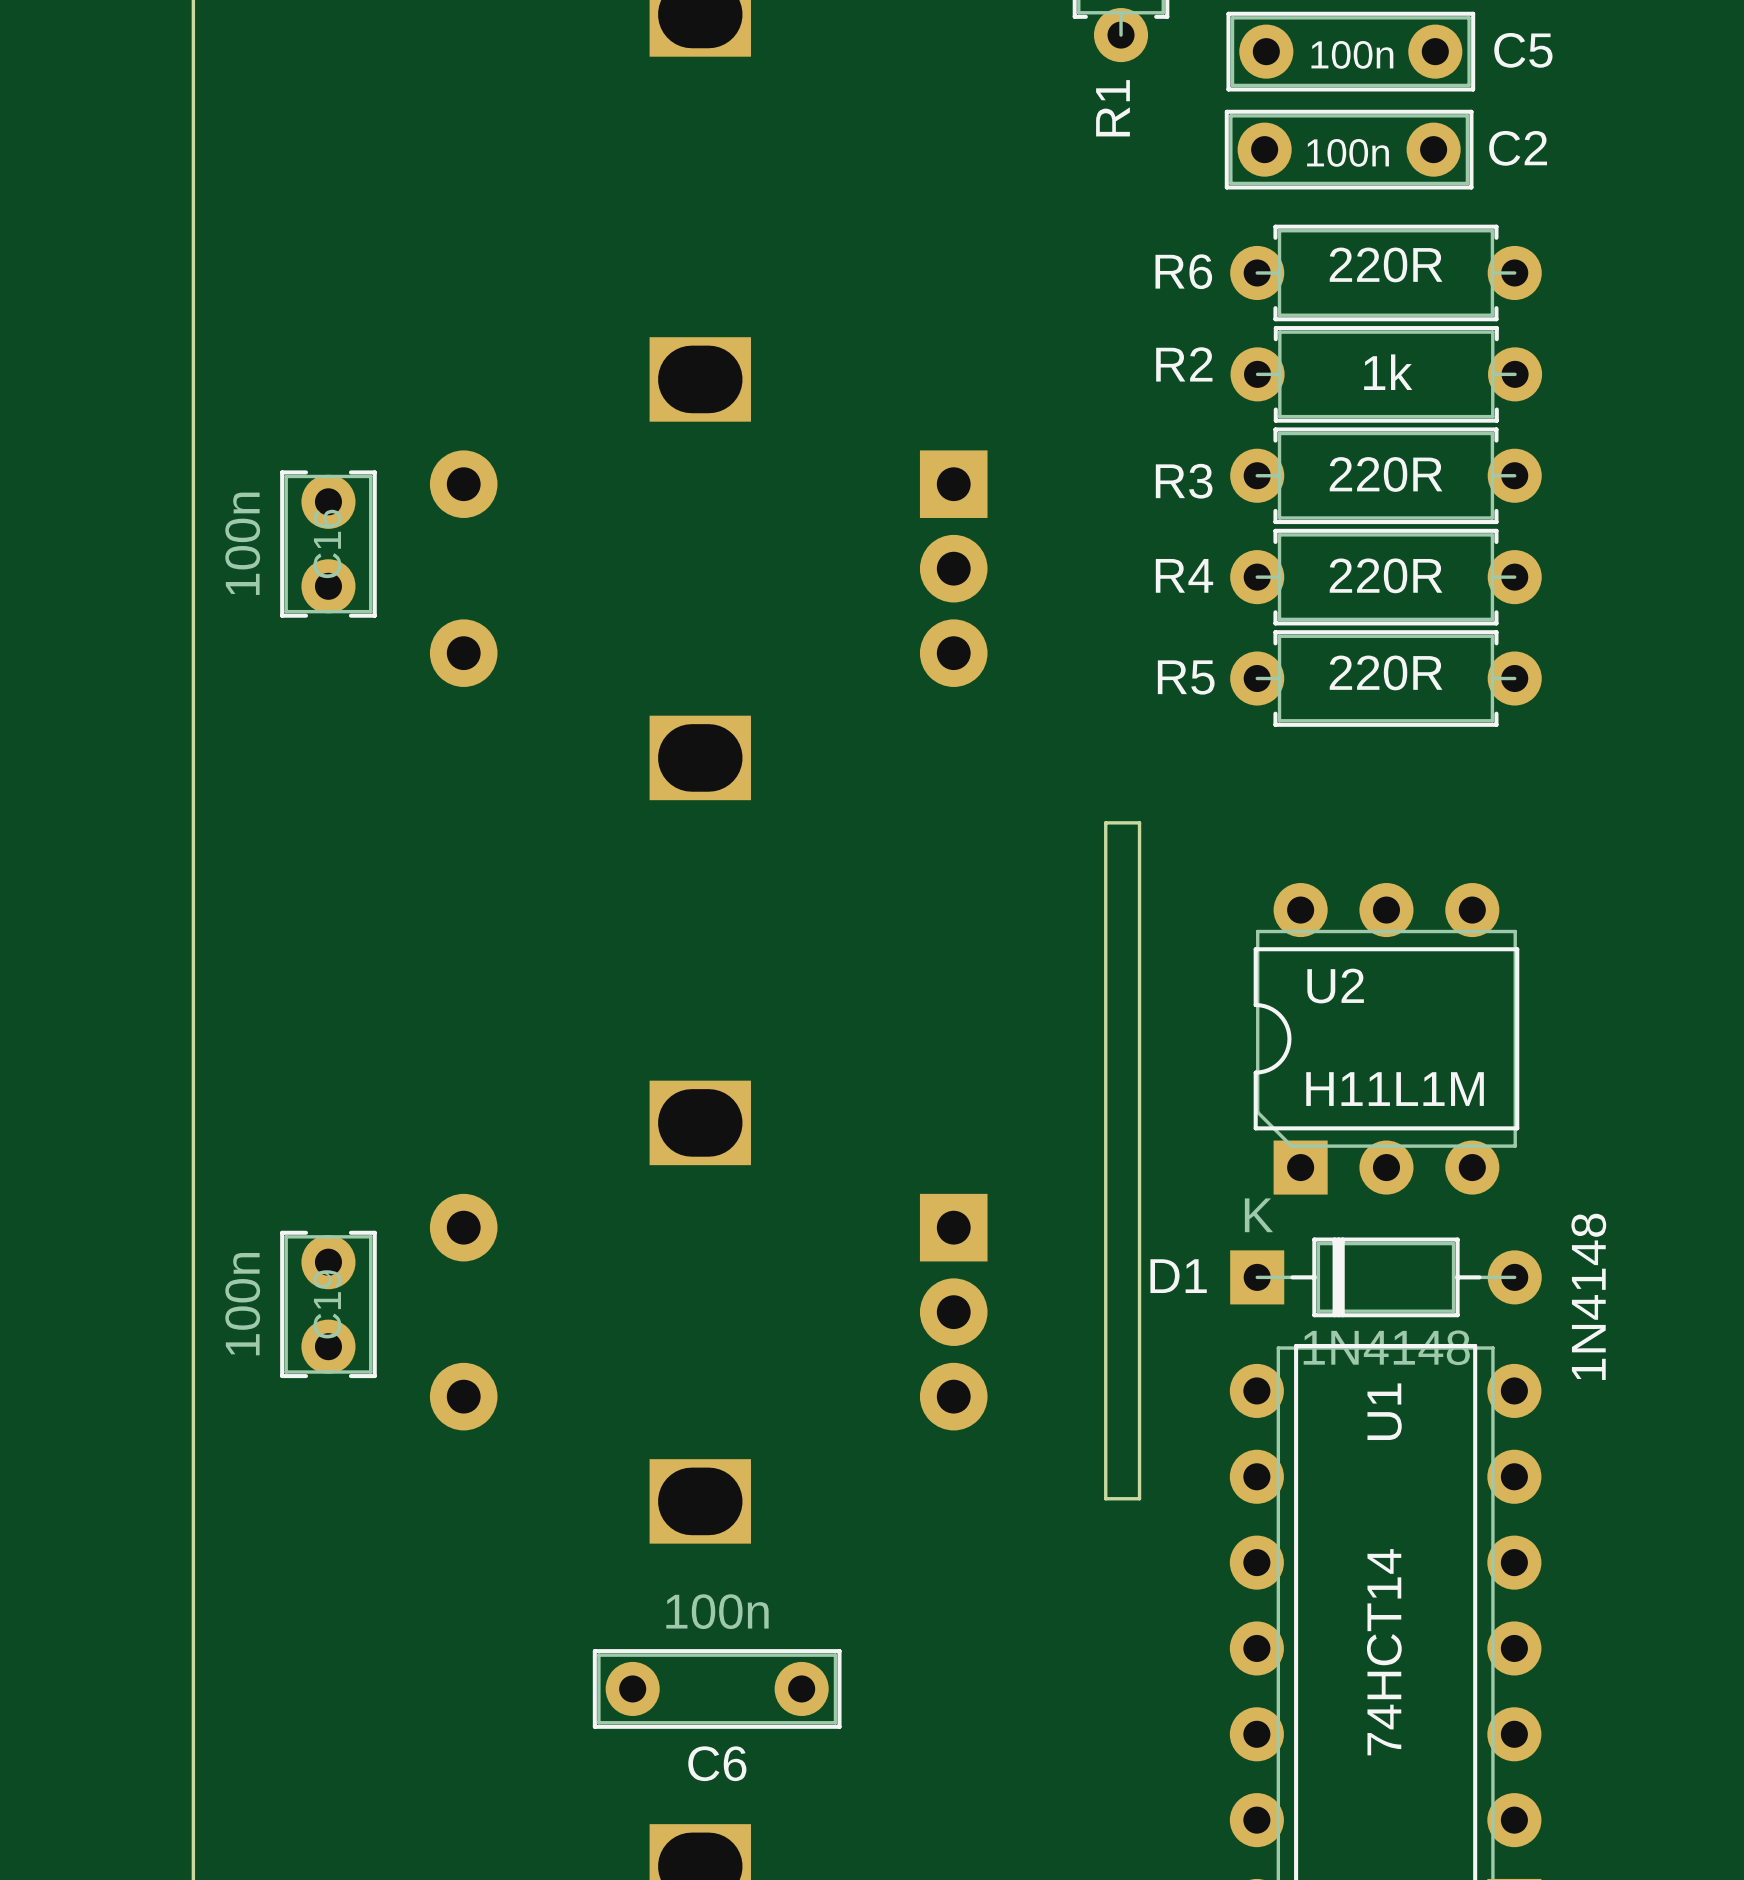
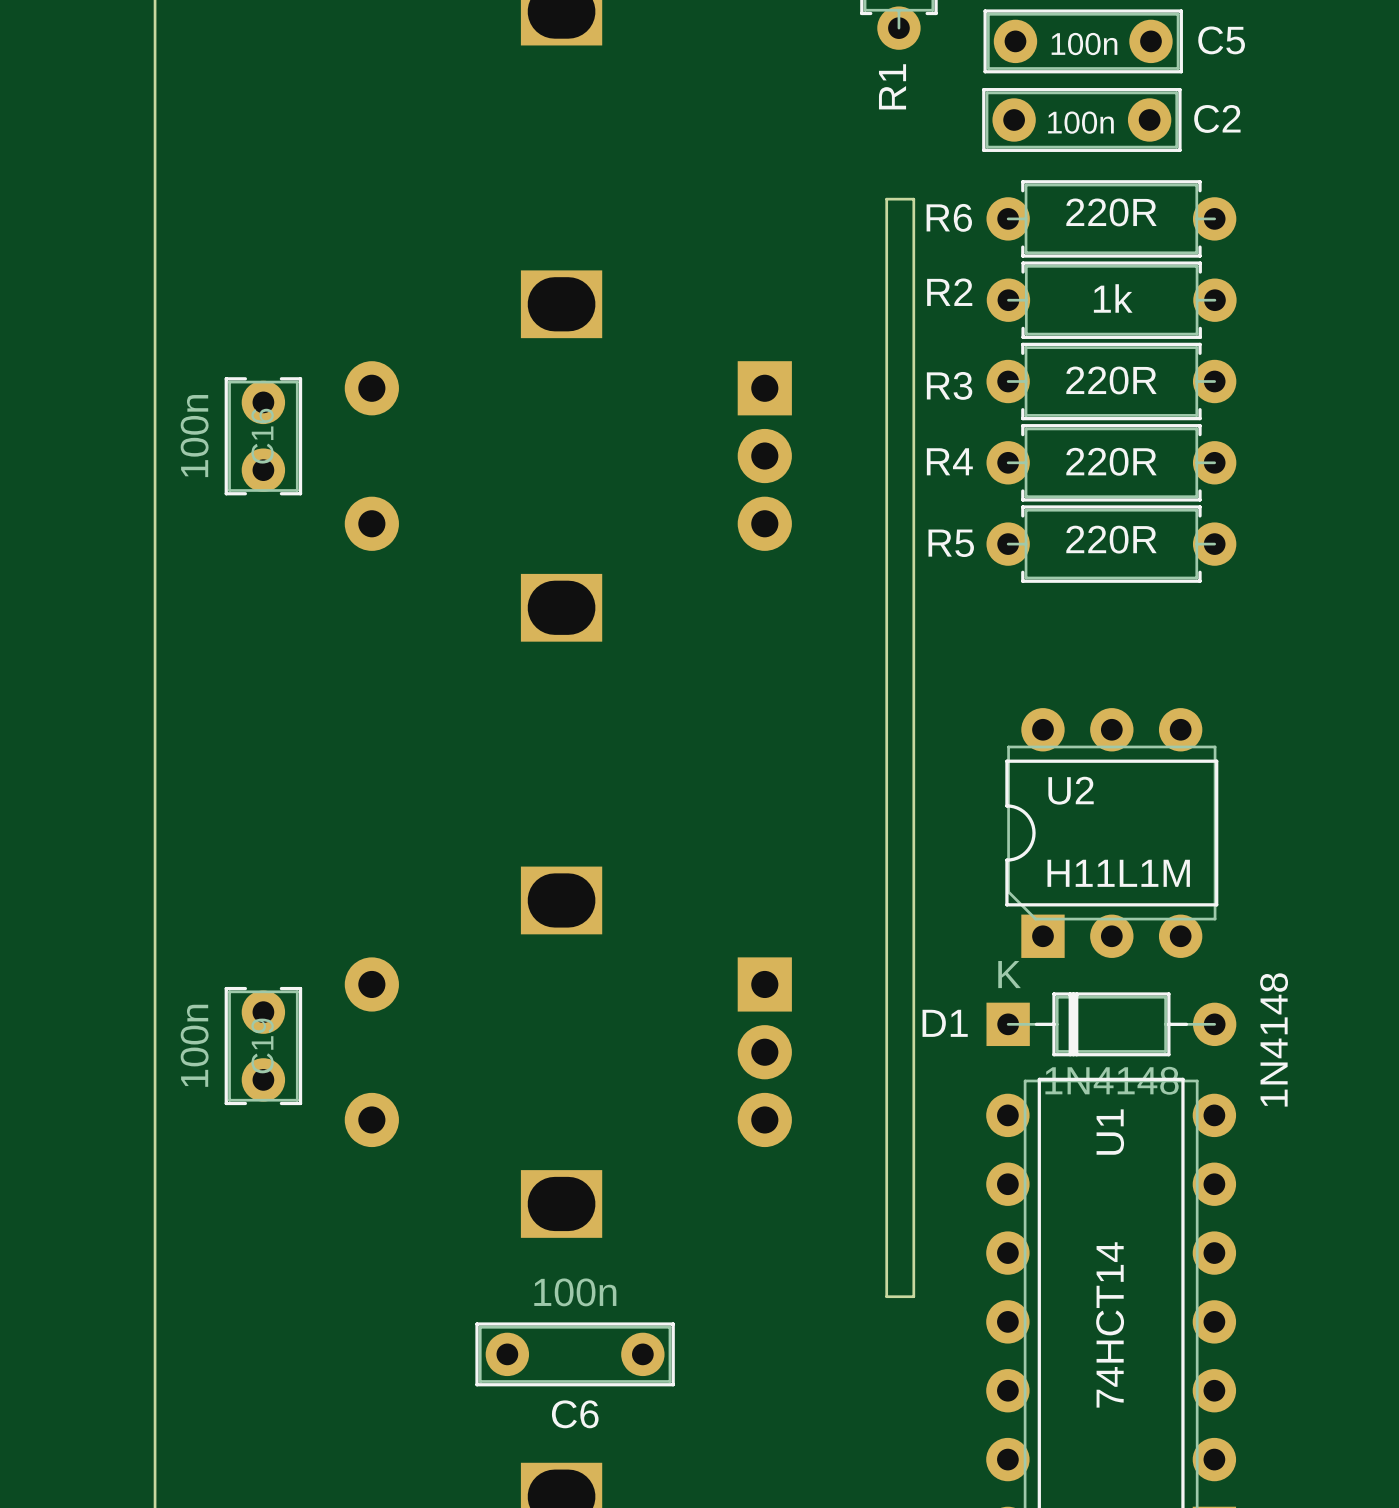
board edge: (1105, 822) (1139, 822) -> (886, 659) (886, 199) (913, 199) (913, 659)
board edge: (1105, 1498) (1139, 1498) -> (886, 1201) (886, 1296) (913, 1296) (913, 1201)

